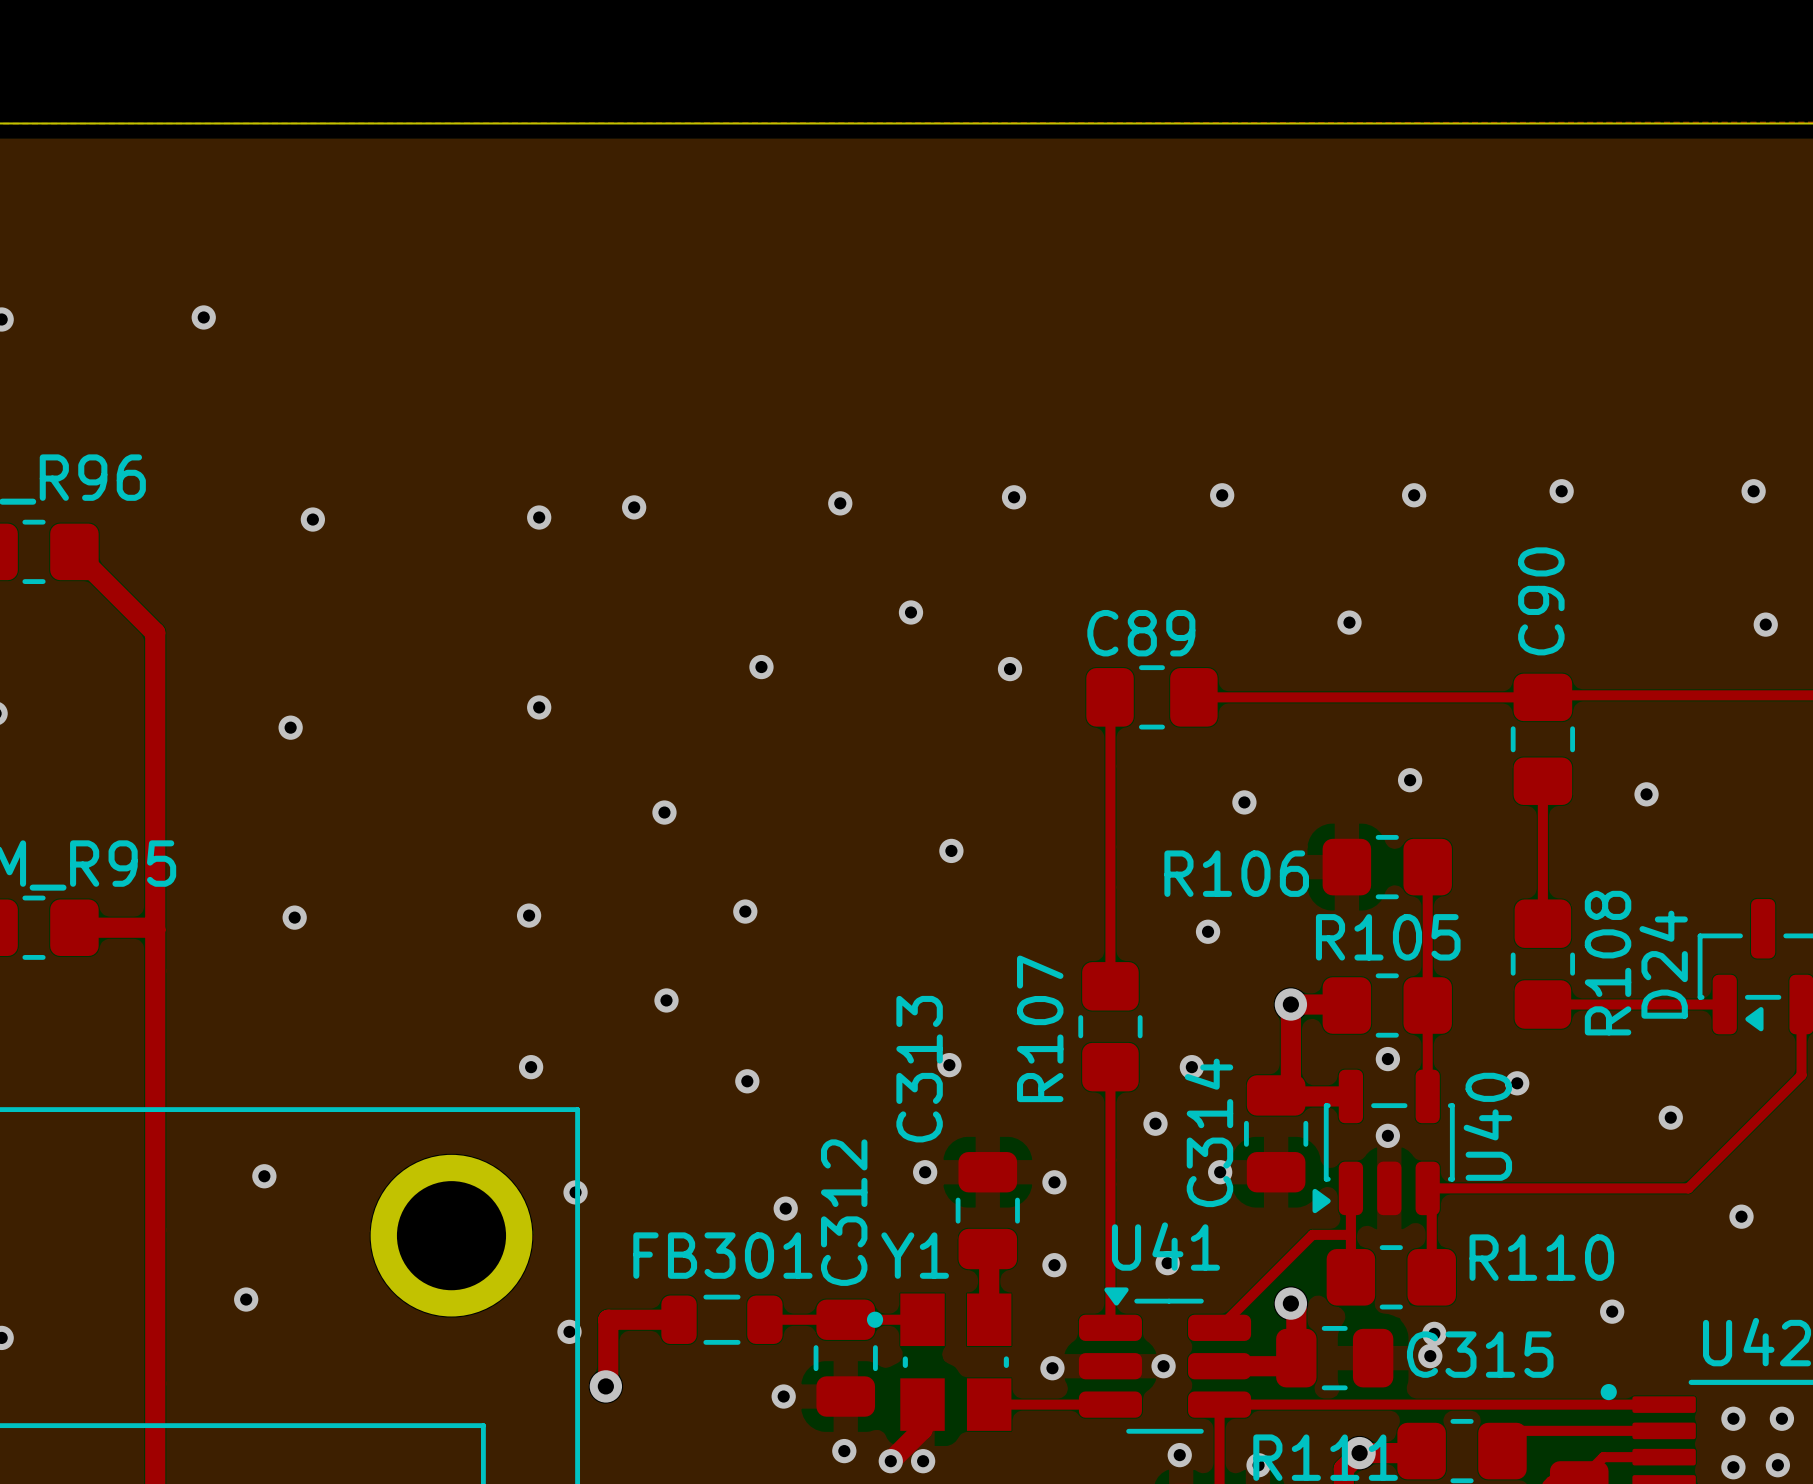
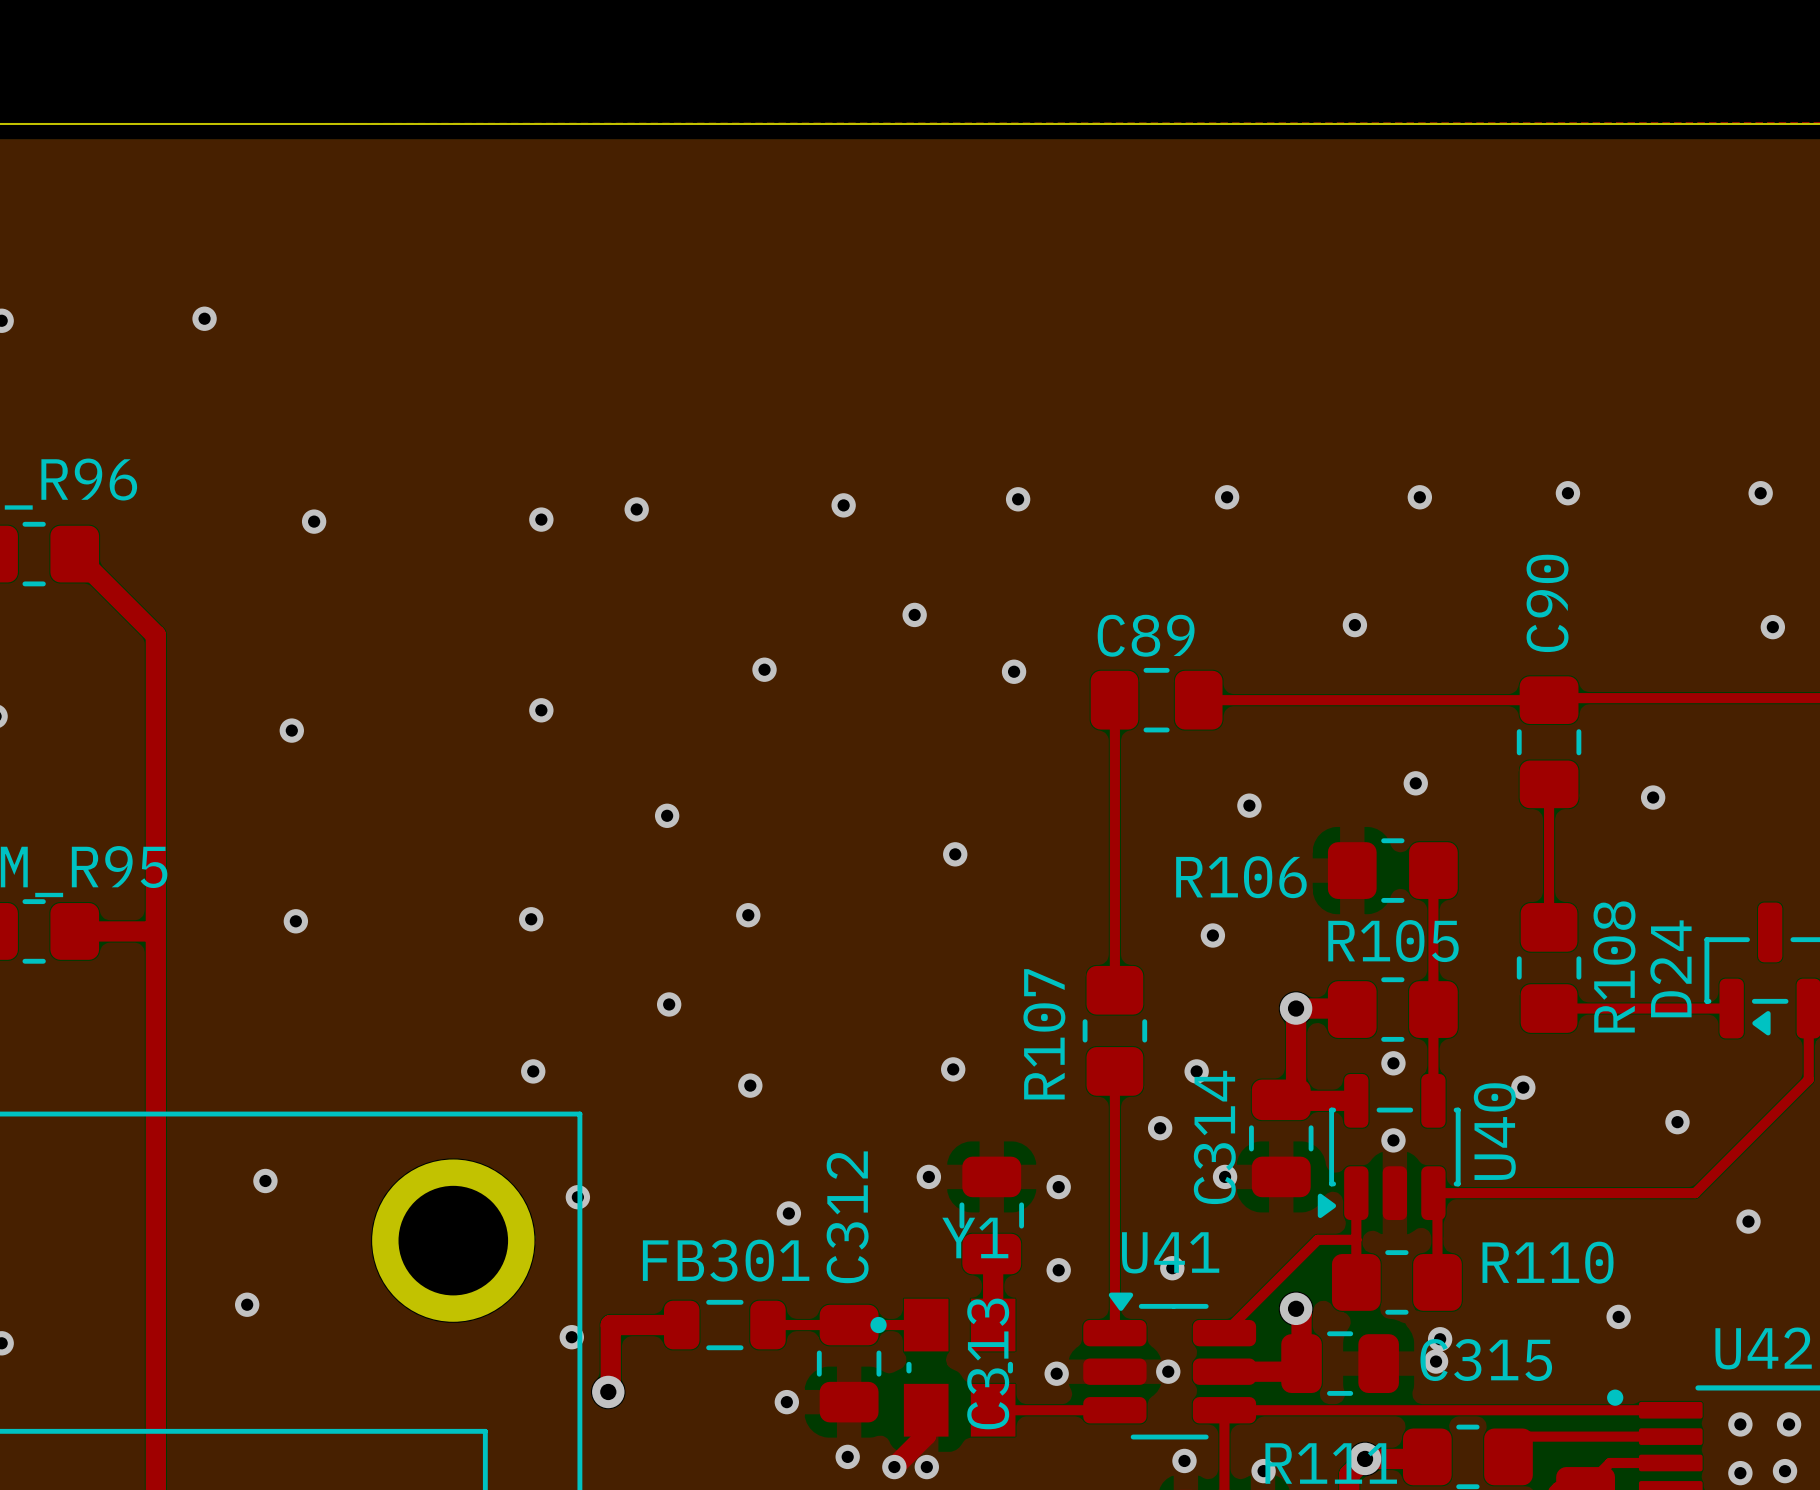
C313 name position: C313 (919, 1069) -> C313 (988, 1363)
Y1 name position: Y1 (915, 1255) -> Y1 (975, 1237)

